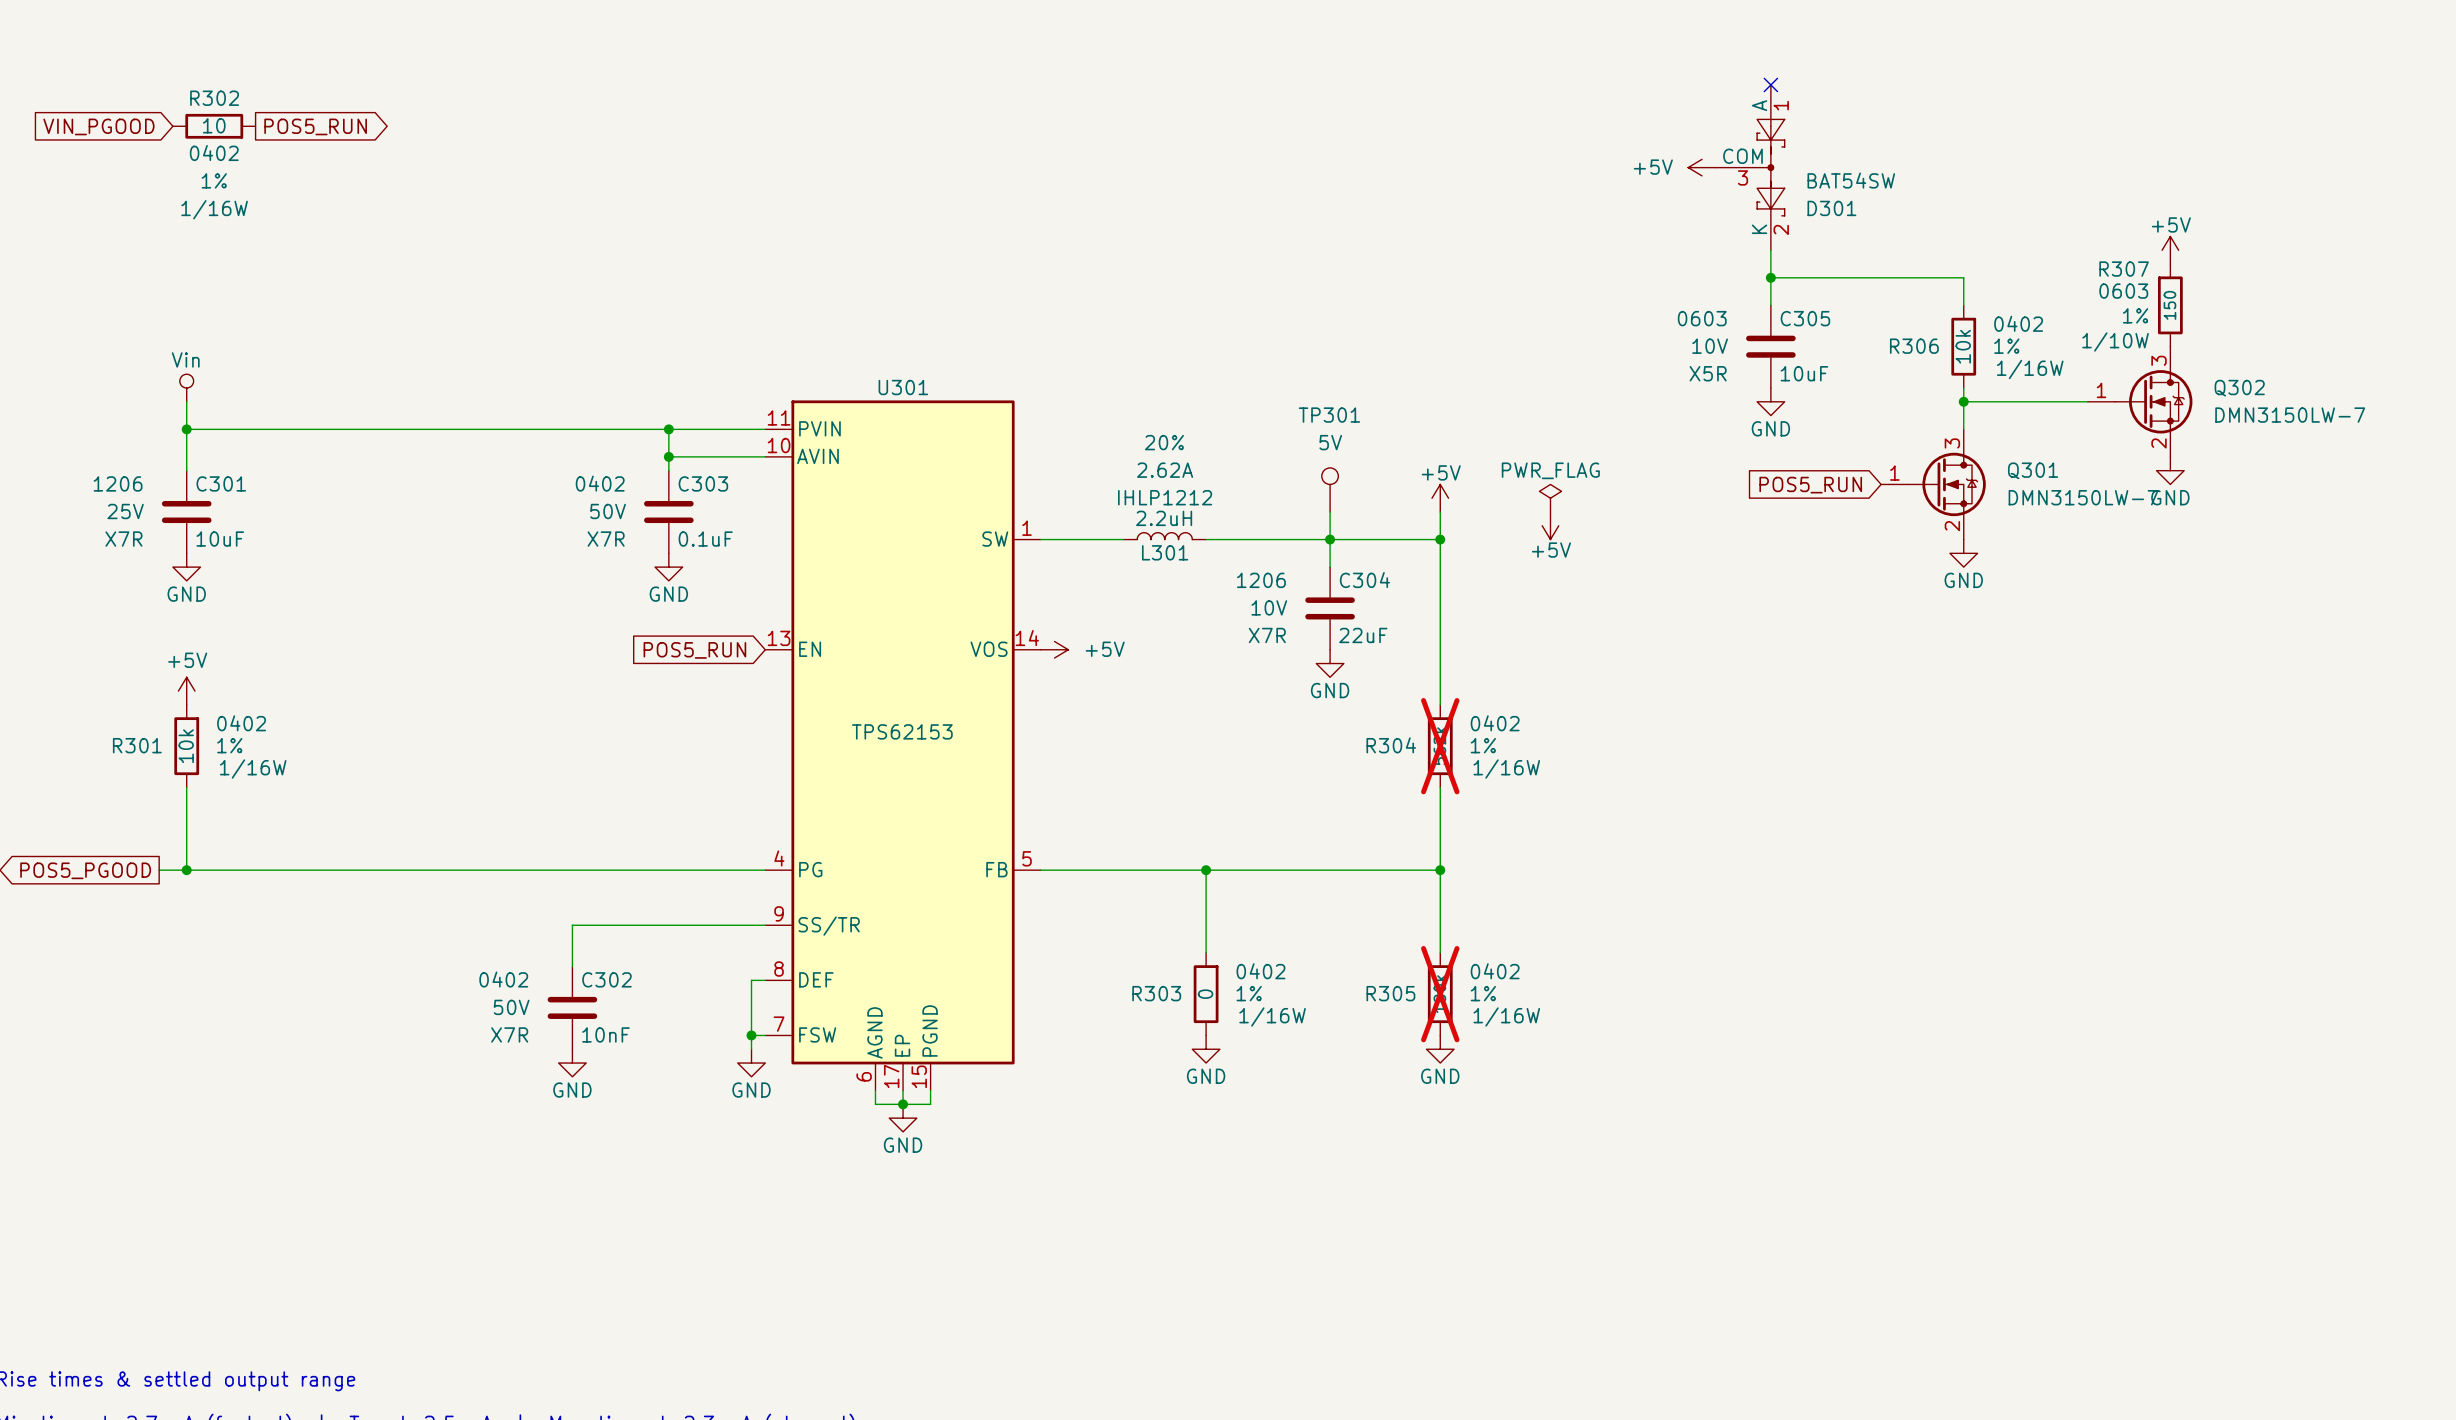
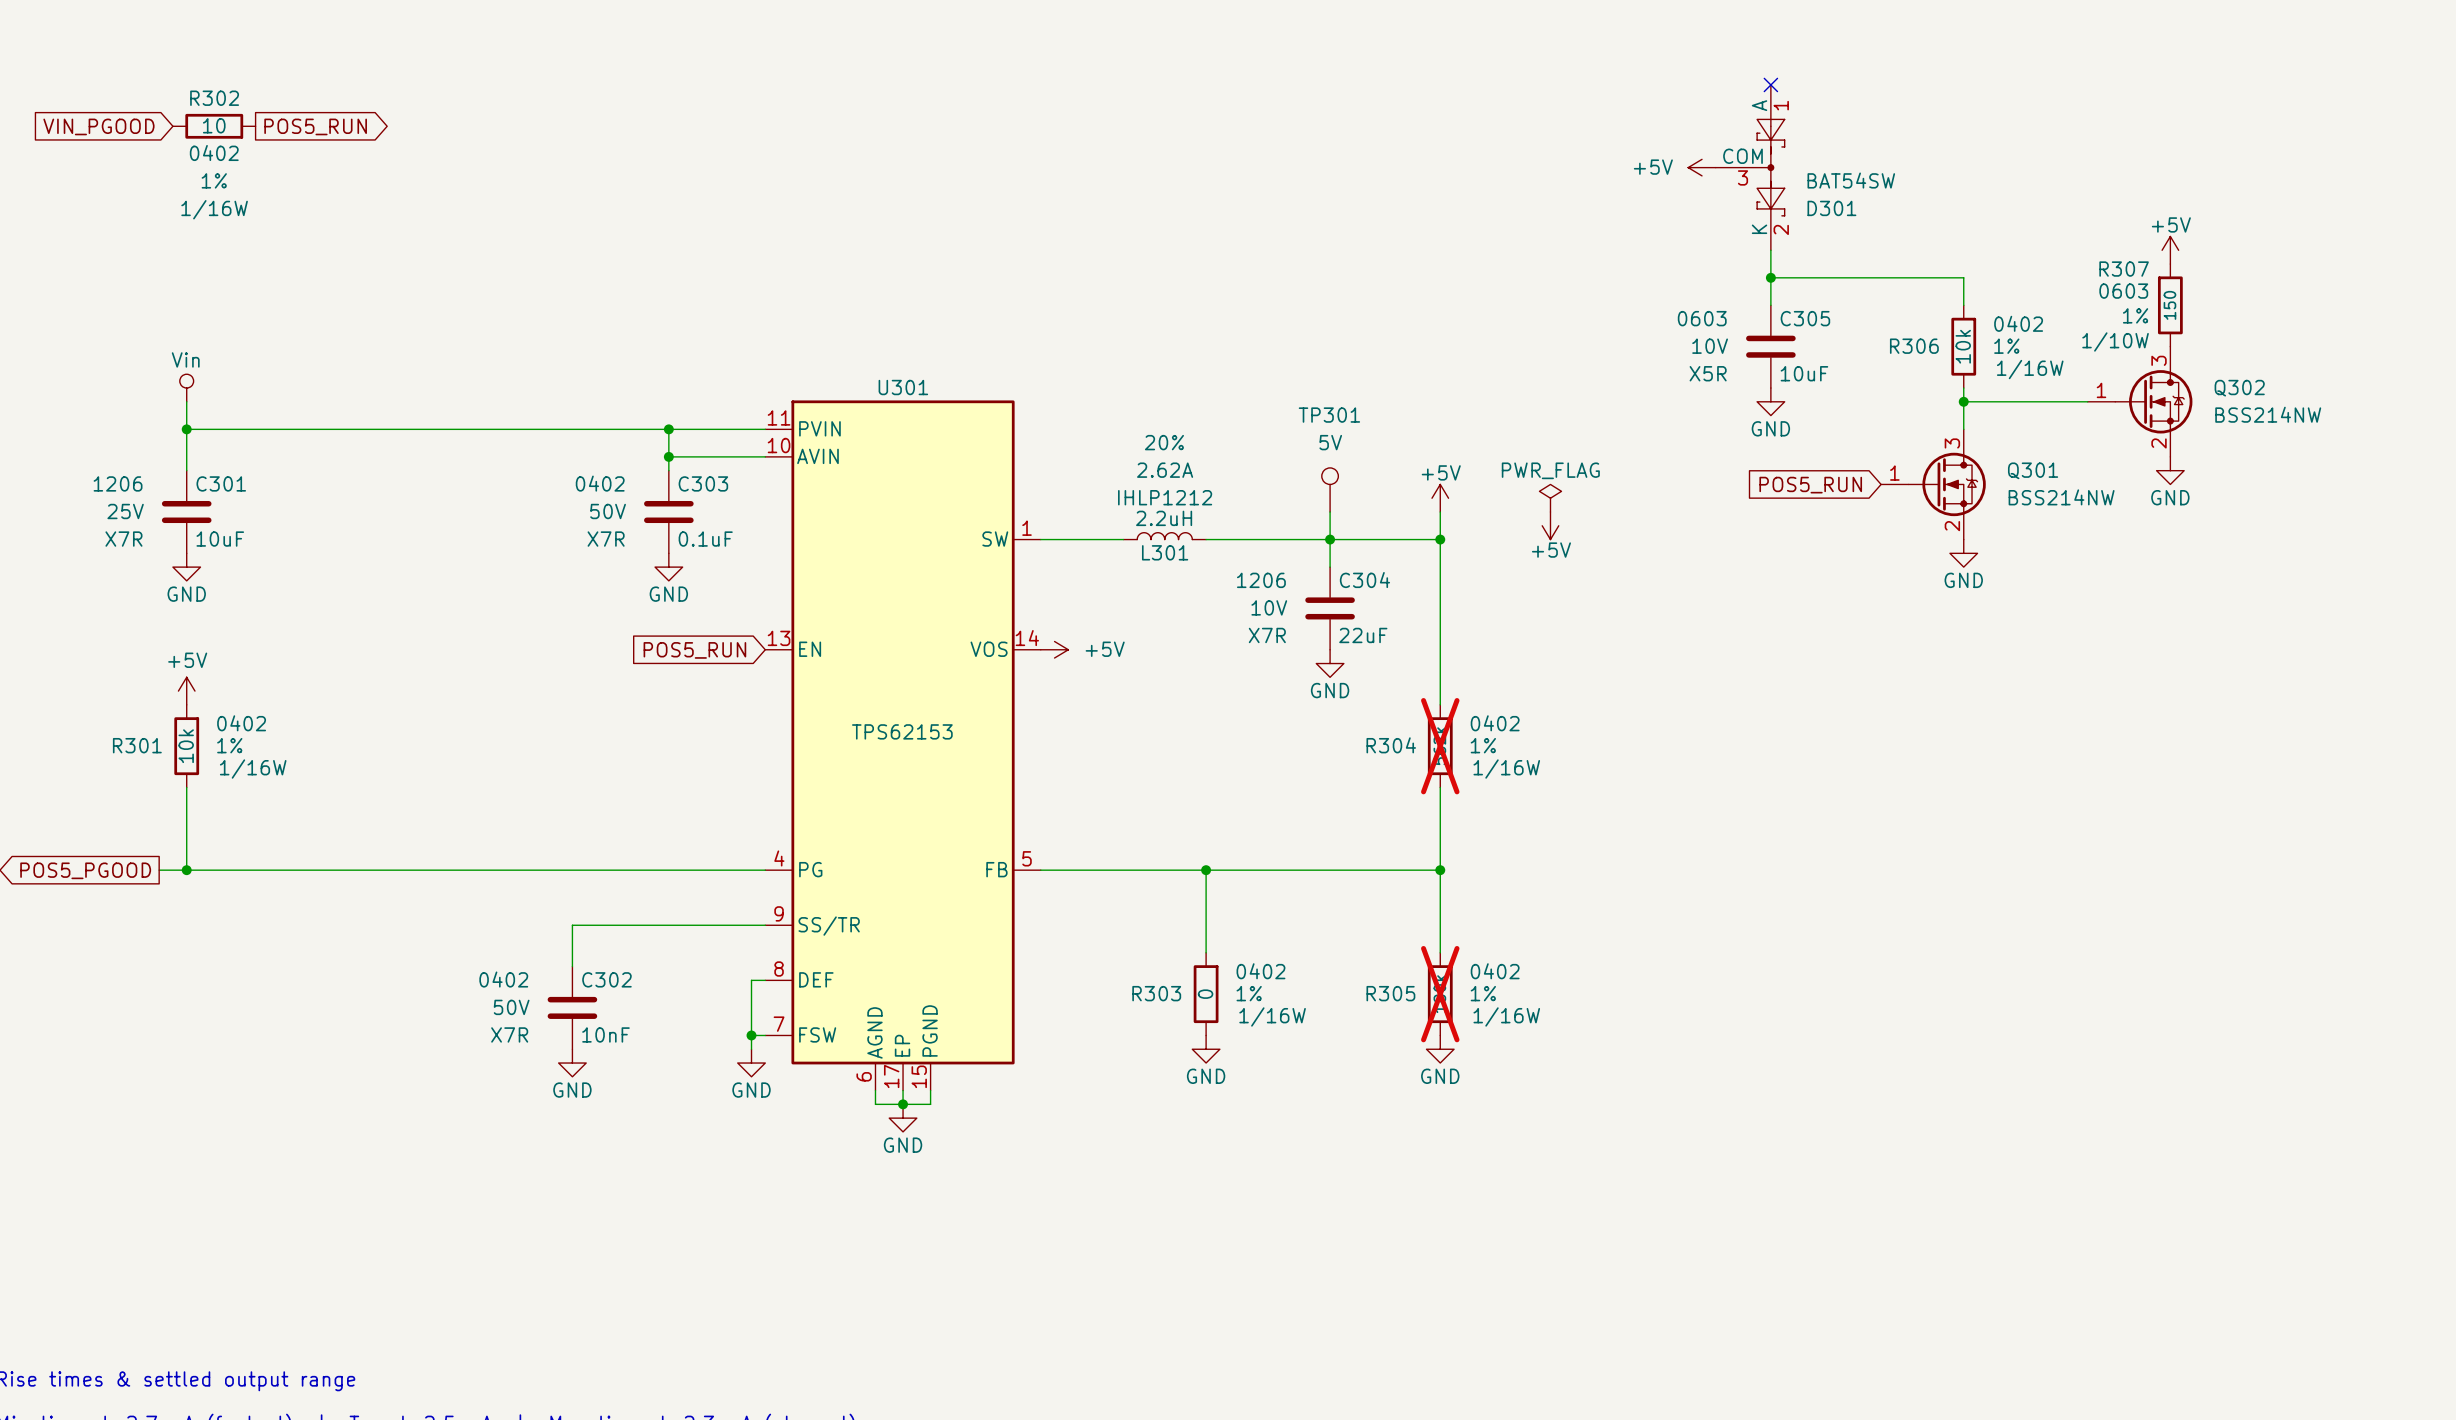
Q302 value: DMN3150LW-7 (2290, 415) -> BSS214NW (2268, 414)
Q301 value: DMN3150LW-7 (2083, 497) -> BSS214NW (2061, 497)

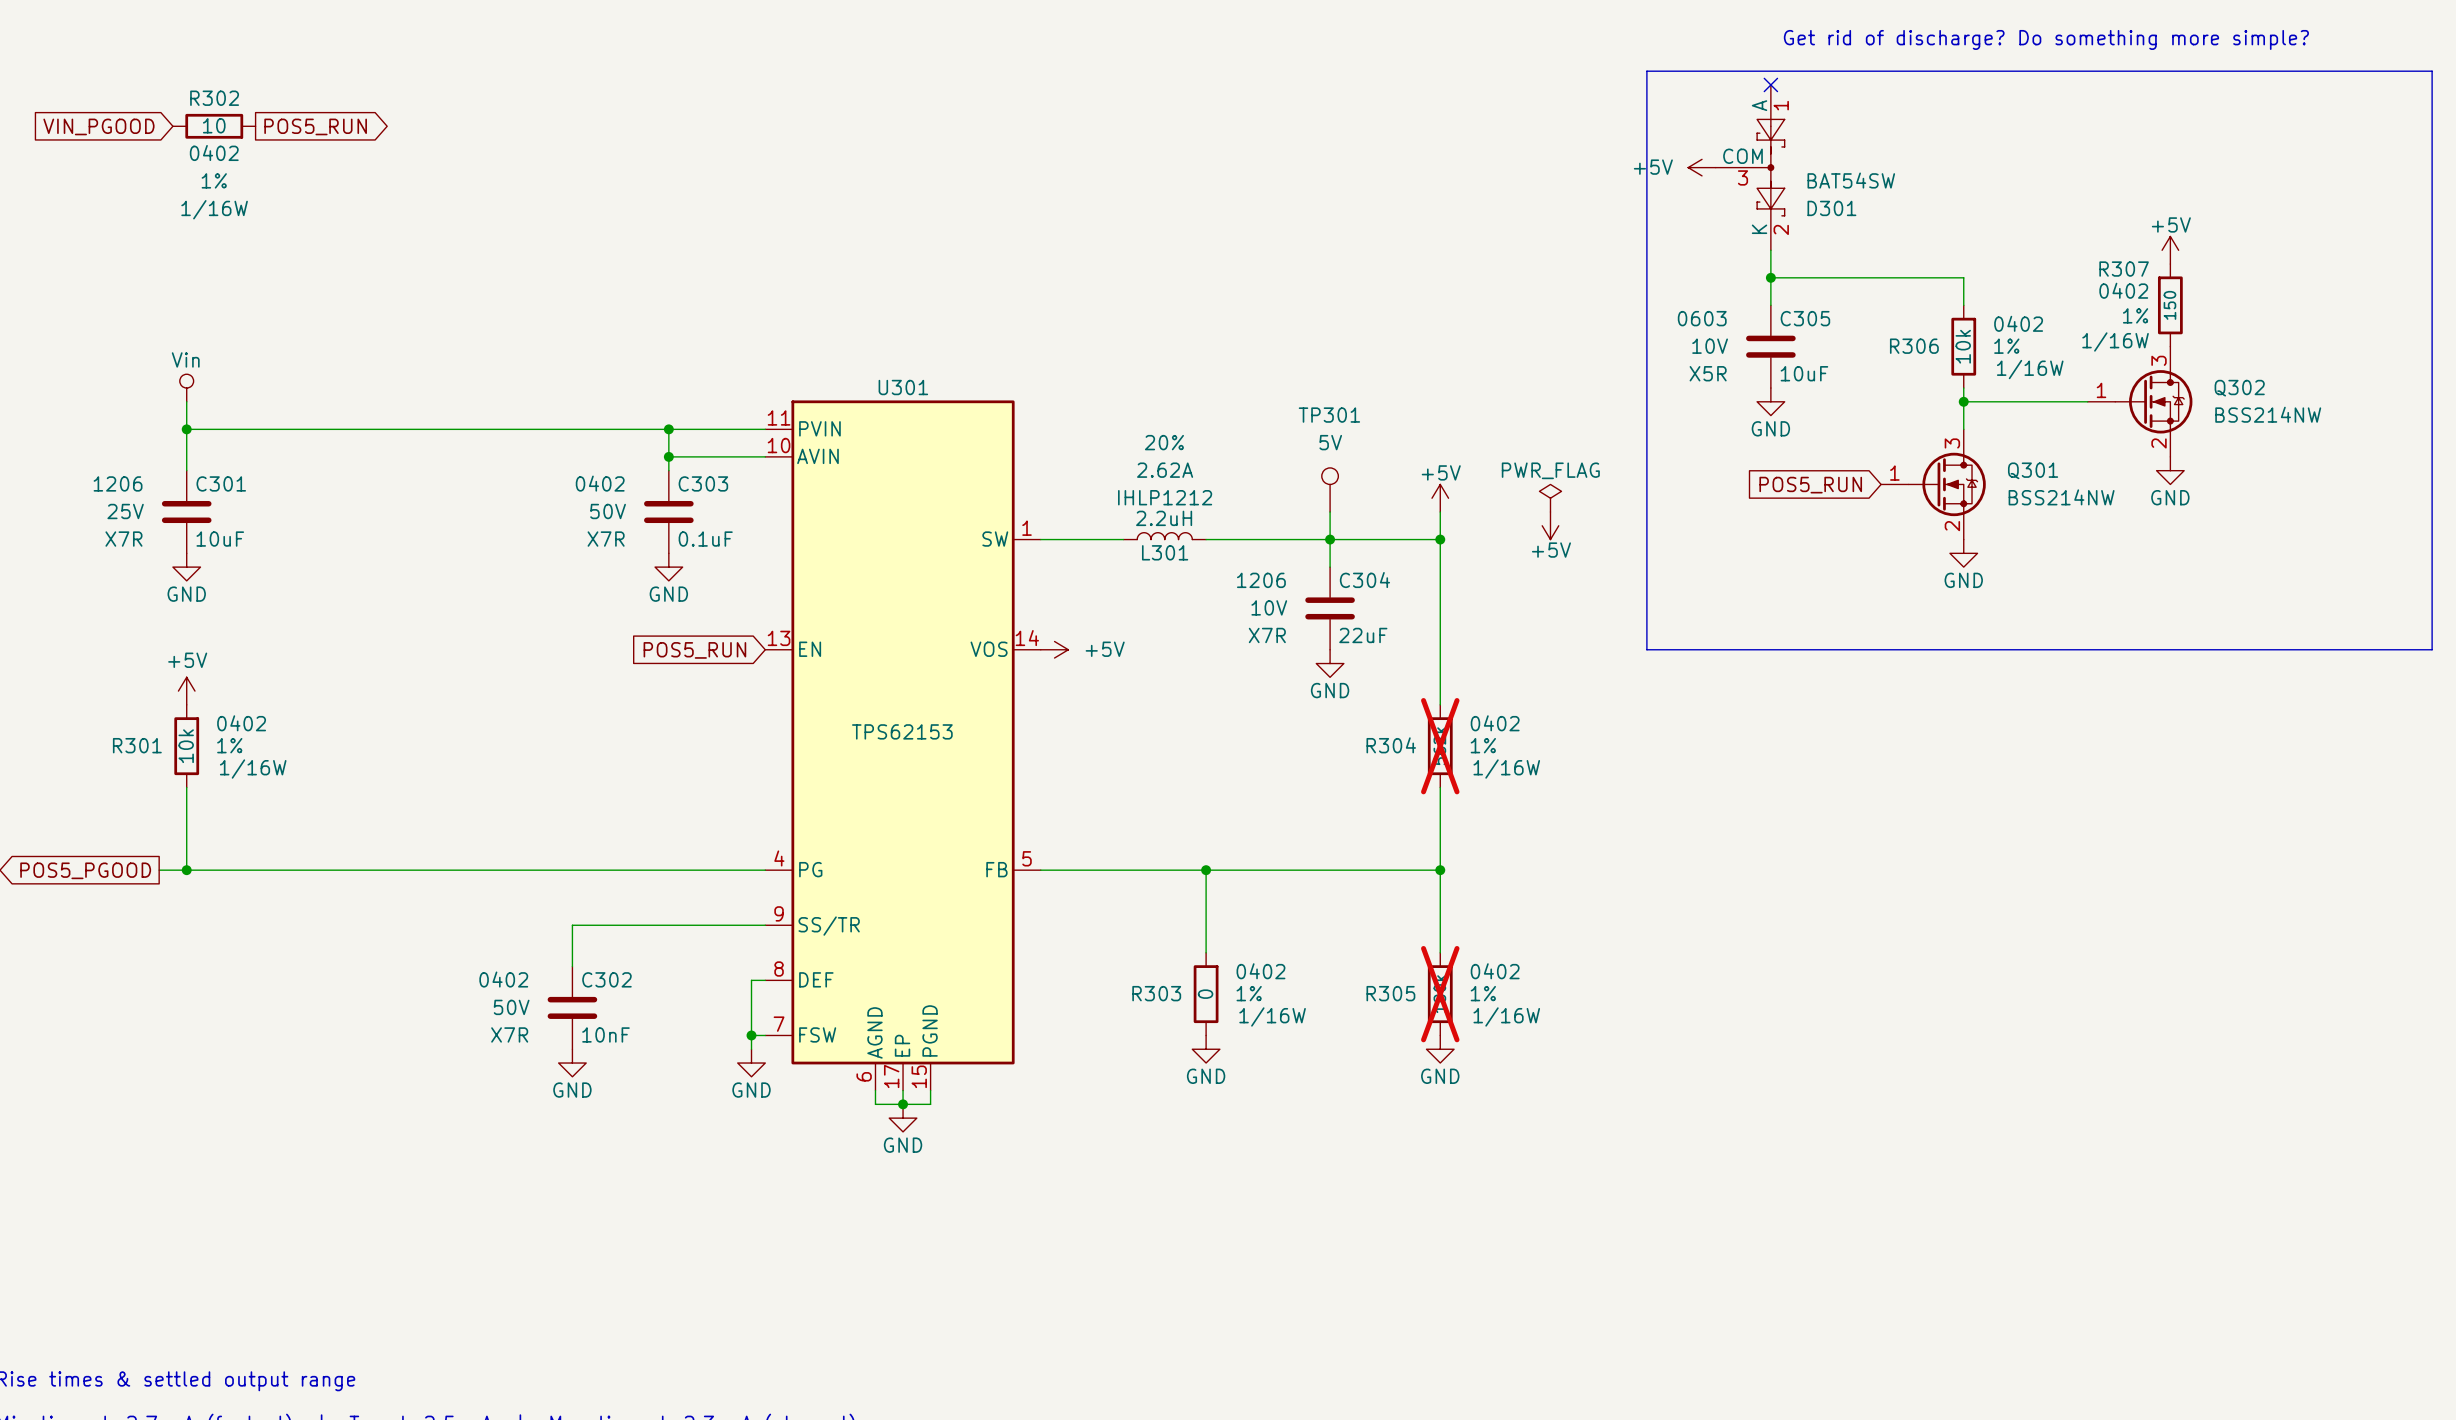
text: none -> Get rid of discharge? Do something more simple? (2046, 39)
line: none -> (1646, 71) (2432, 71) (2432, 649) (1646, 649) (1646, 71)
R307 text: 0603 (2123, 291) -> 0402 (2123, 290)
R307 text: 1/10W (2115, 341) -> 1/16W (2115, 341)

